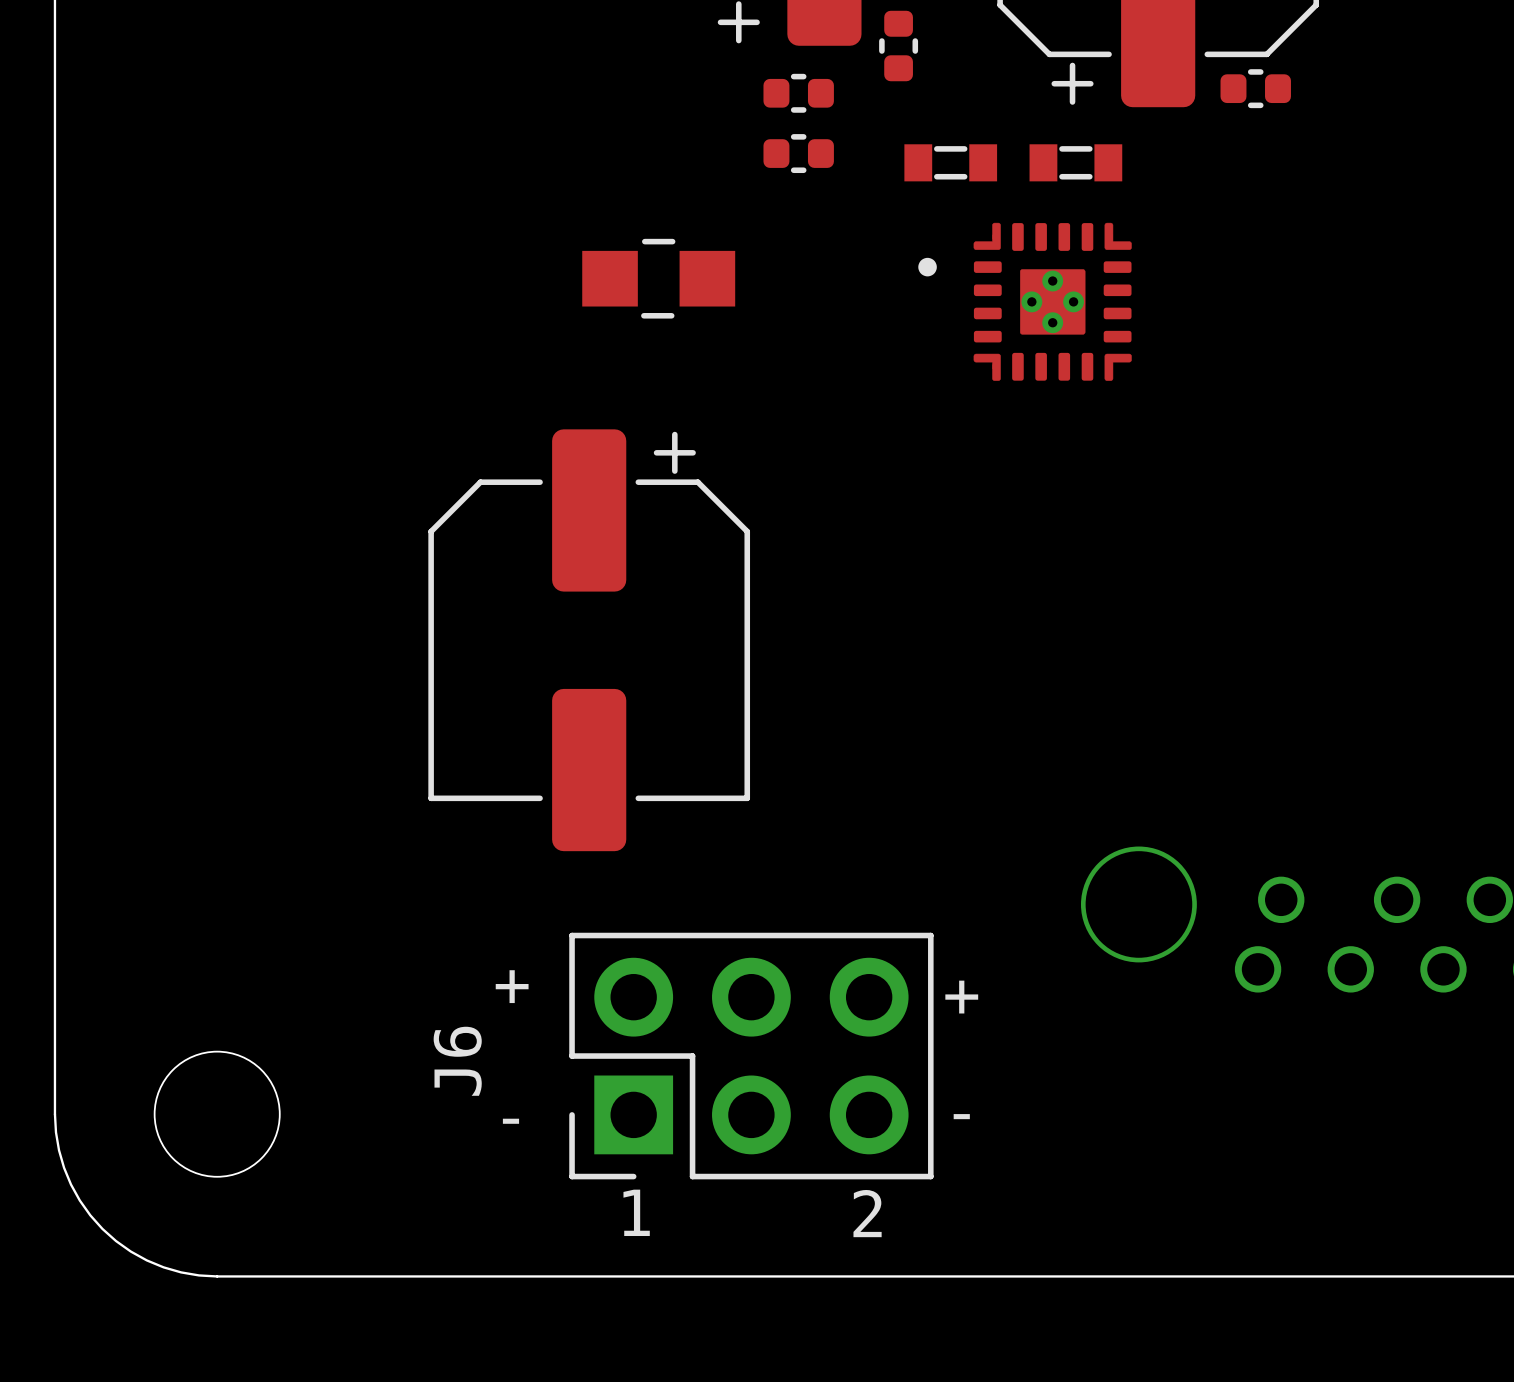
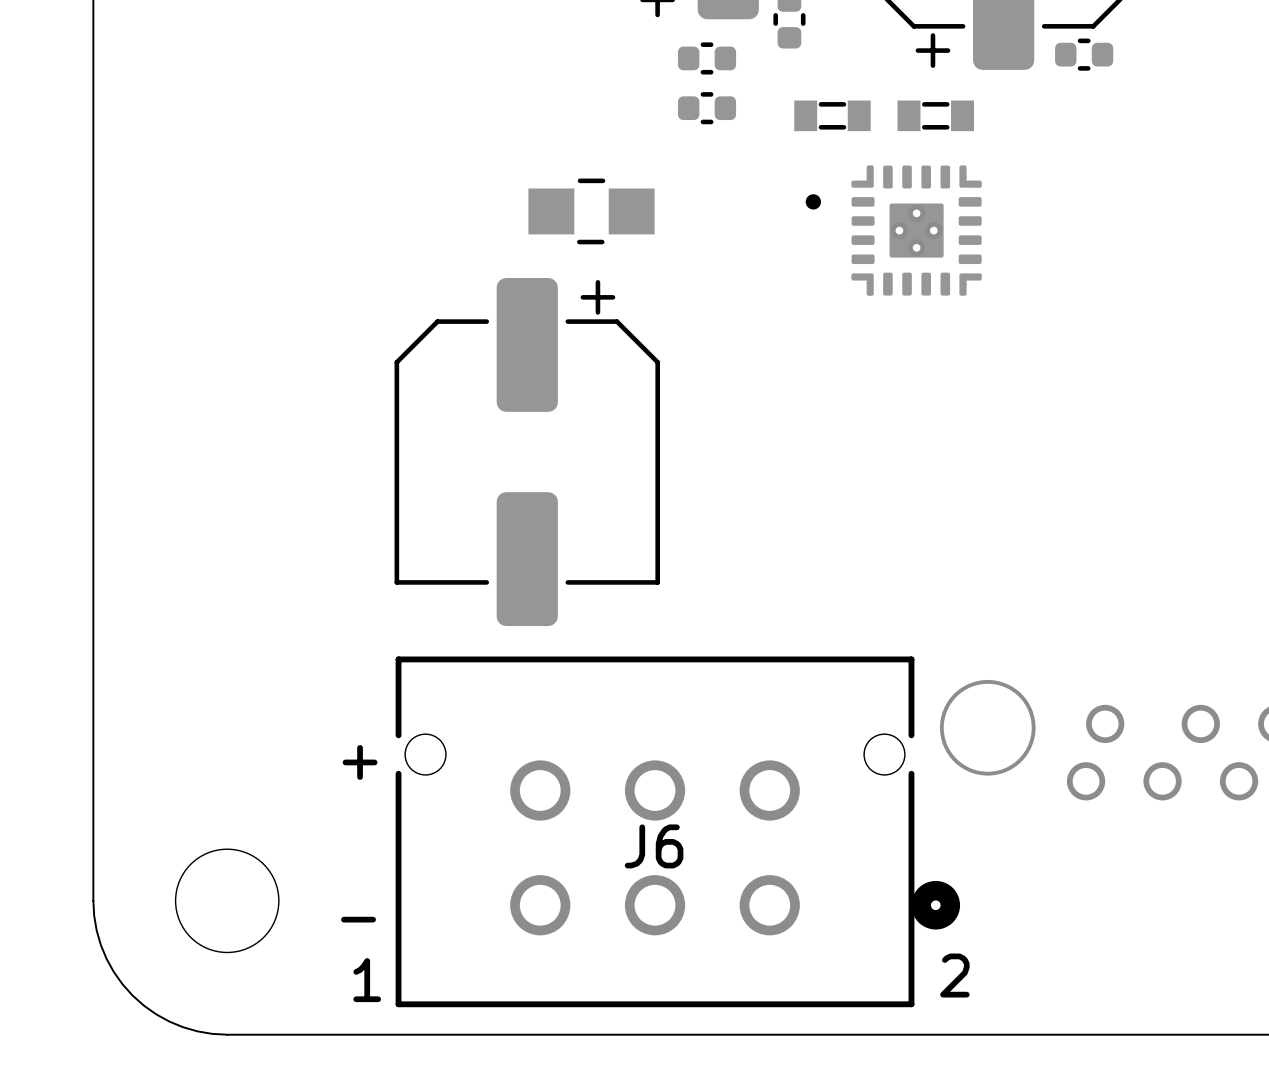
part position: (589, 640) -> (527, 452)
J6 footprint: [569, 932, 934, 1180] -> [395, 656, 961, 1008]
text position: + (512, 986) -> + (360, 762)
text: + (961, 997) -> none
J6 name position: J6 (457, 1061) -> J6 (654, 846)
text: - (961, 1116) -> none
text position: - (510, 1121) -> - (358, 919)
text position: 1 (636, 1212) -> 1 (367, 980)
text position: 2 (867, 1213) -> 2 (954, 975)

